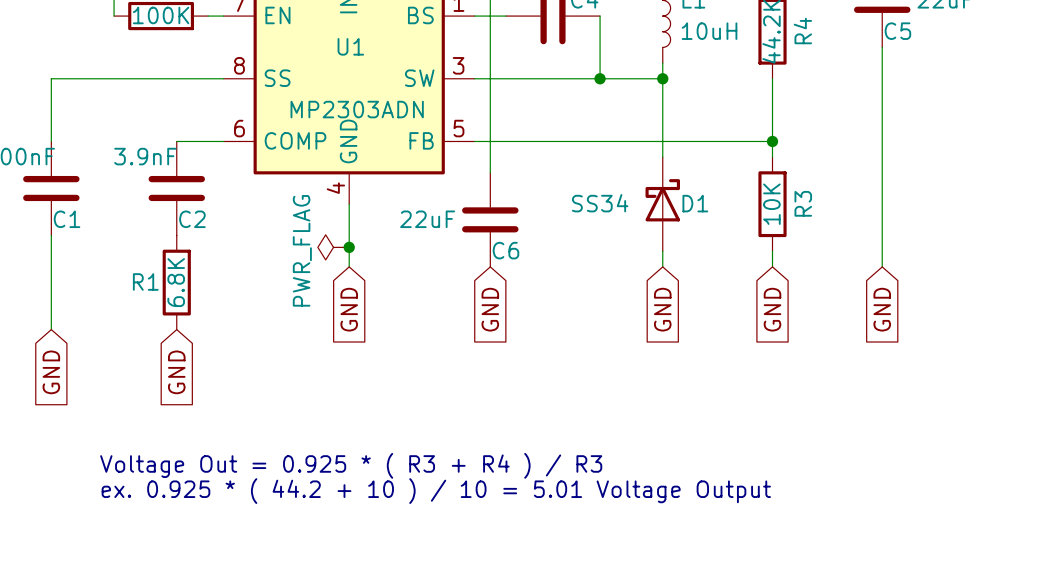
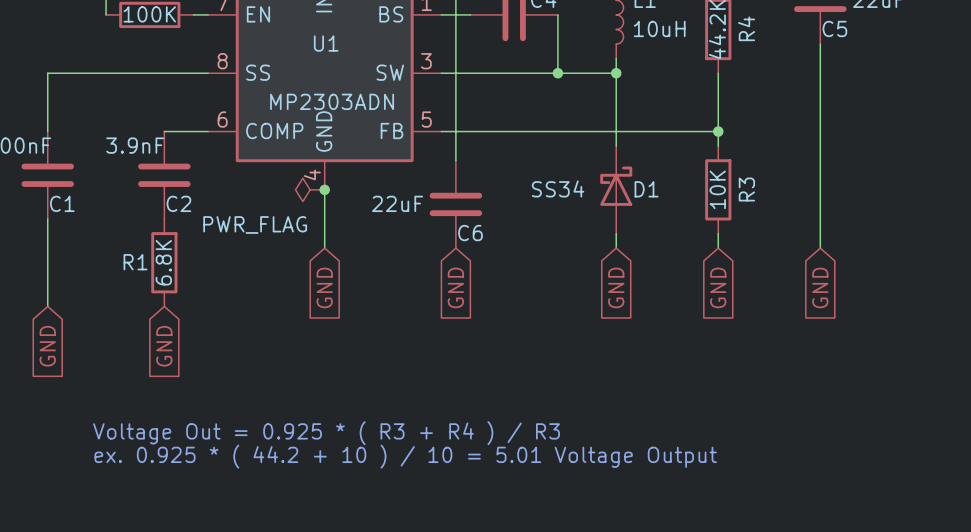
power symbol position: PWR_FLAG (333, 247) -> PWR_FLAG (310, 189)
junction position: (349, 247) -> (324, 189)
power symbol text rotation: 0° (302, 250) -> 90° clockwise (255, 224)

